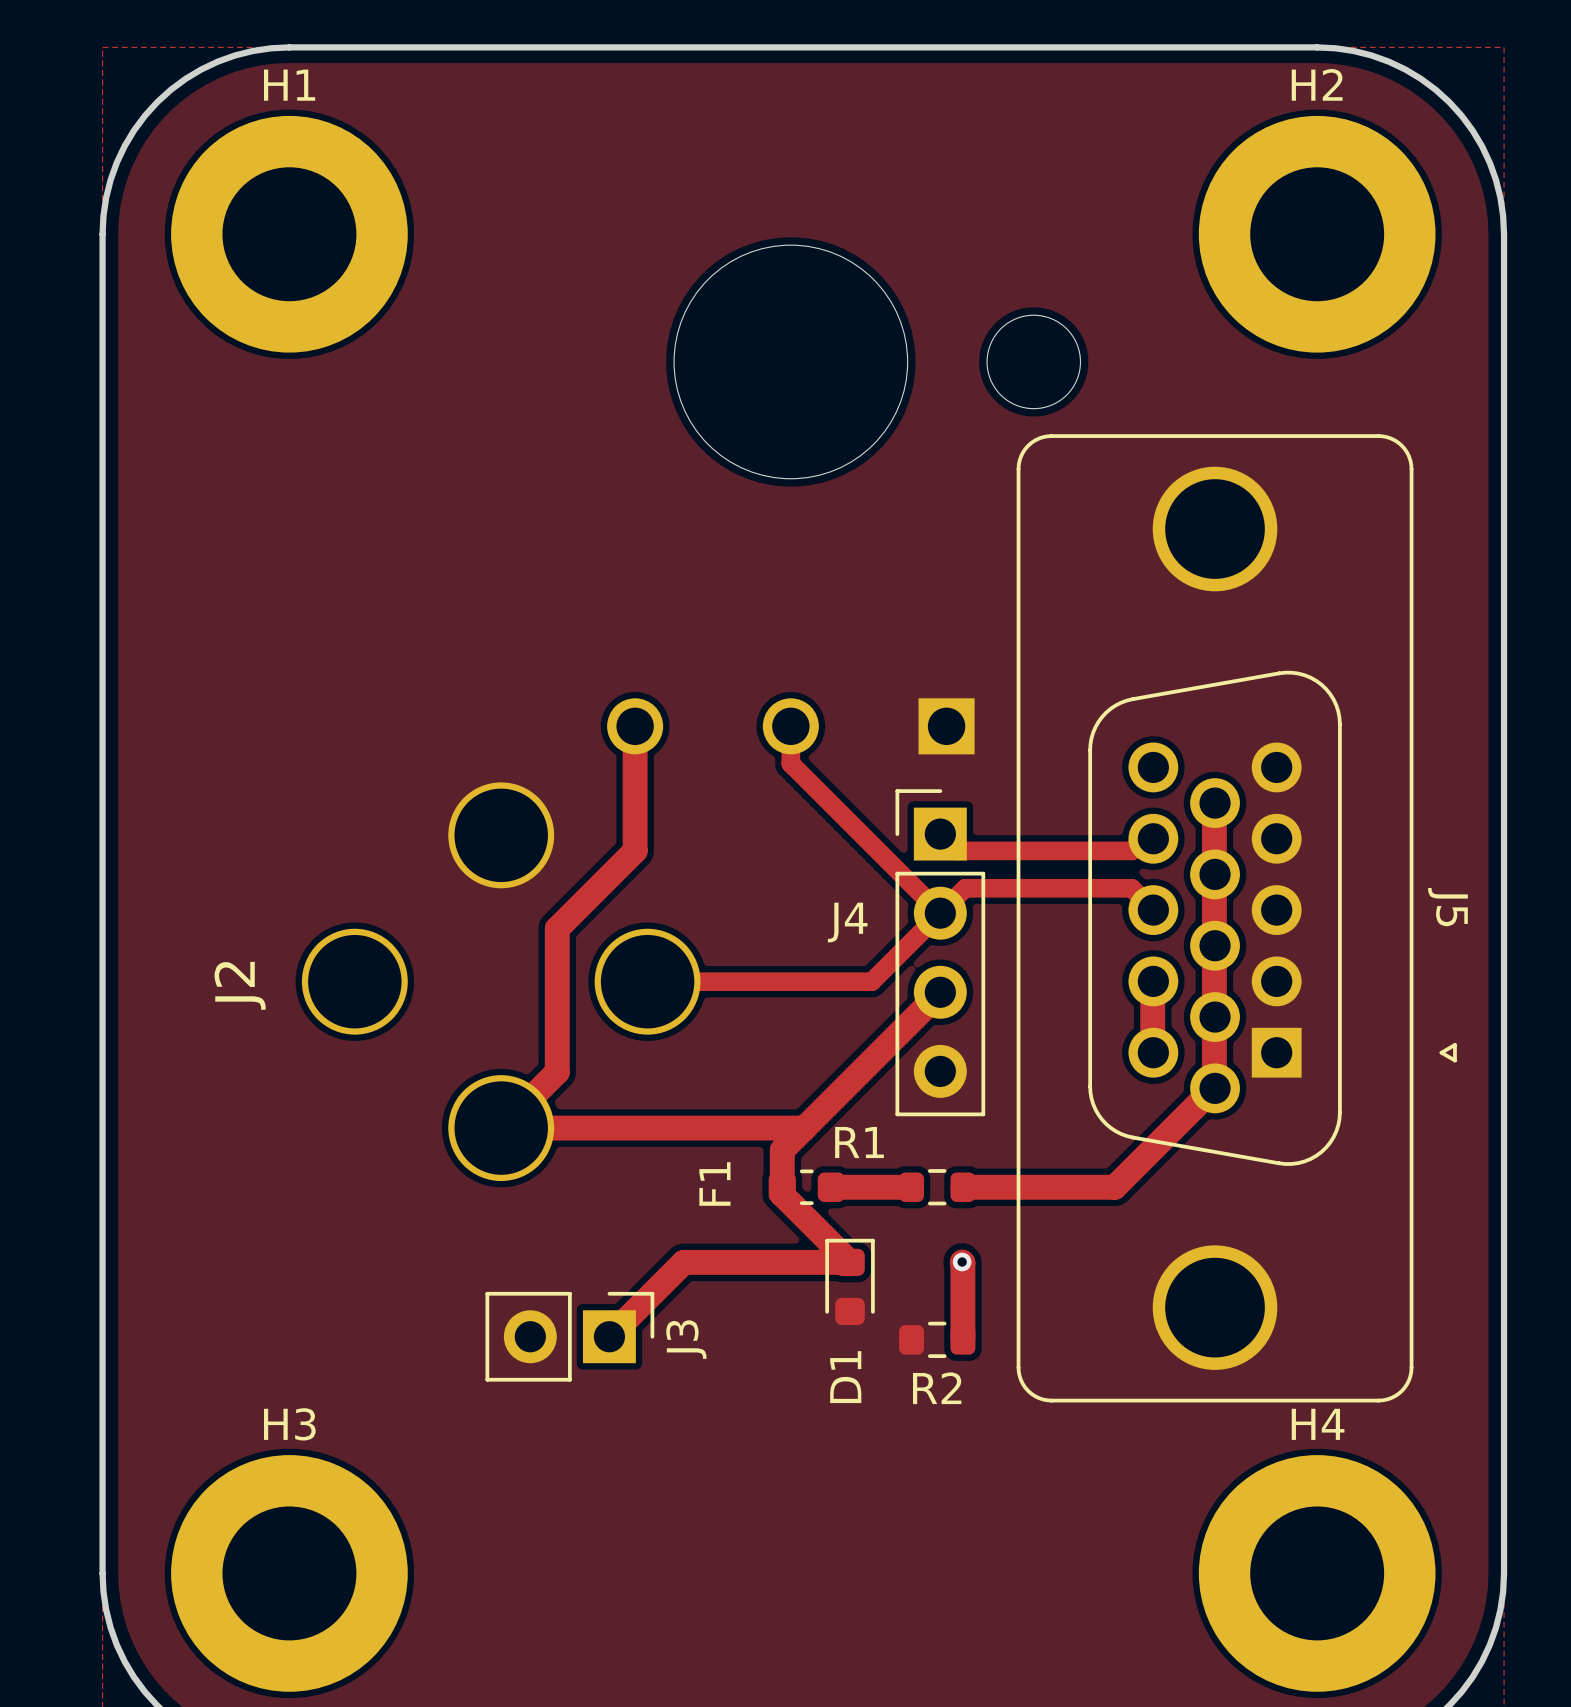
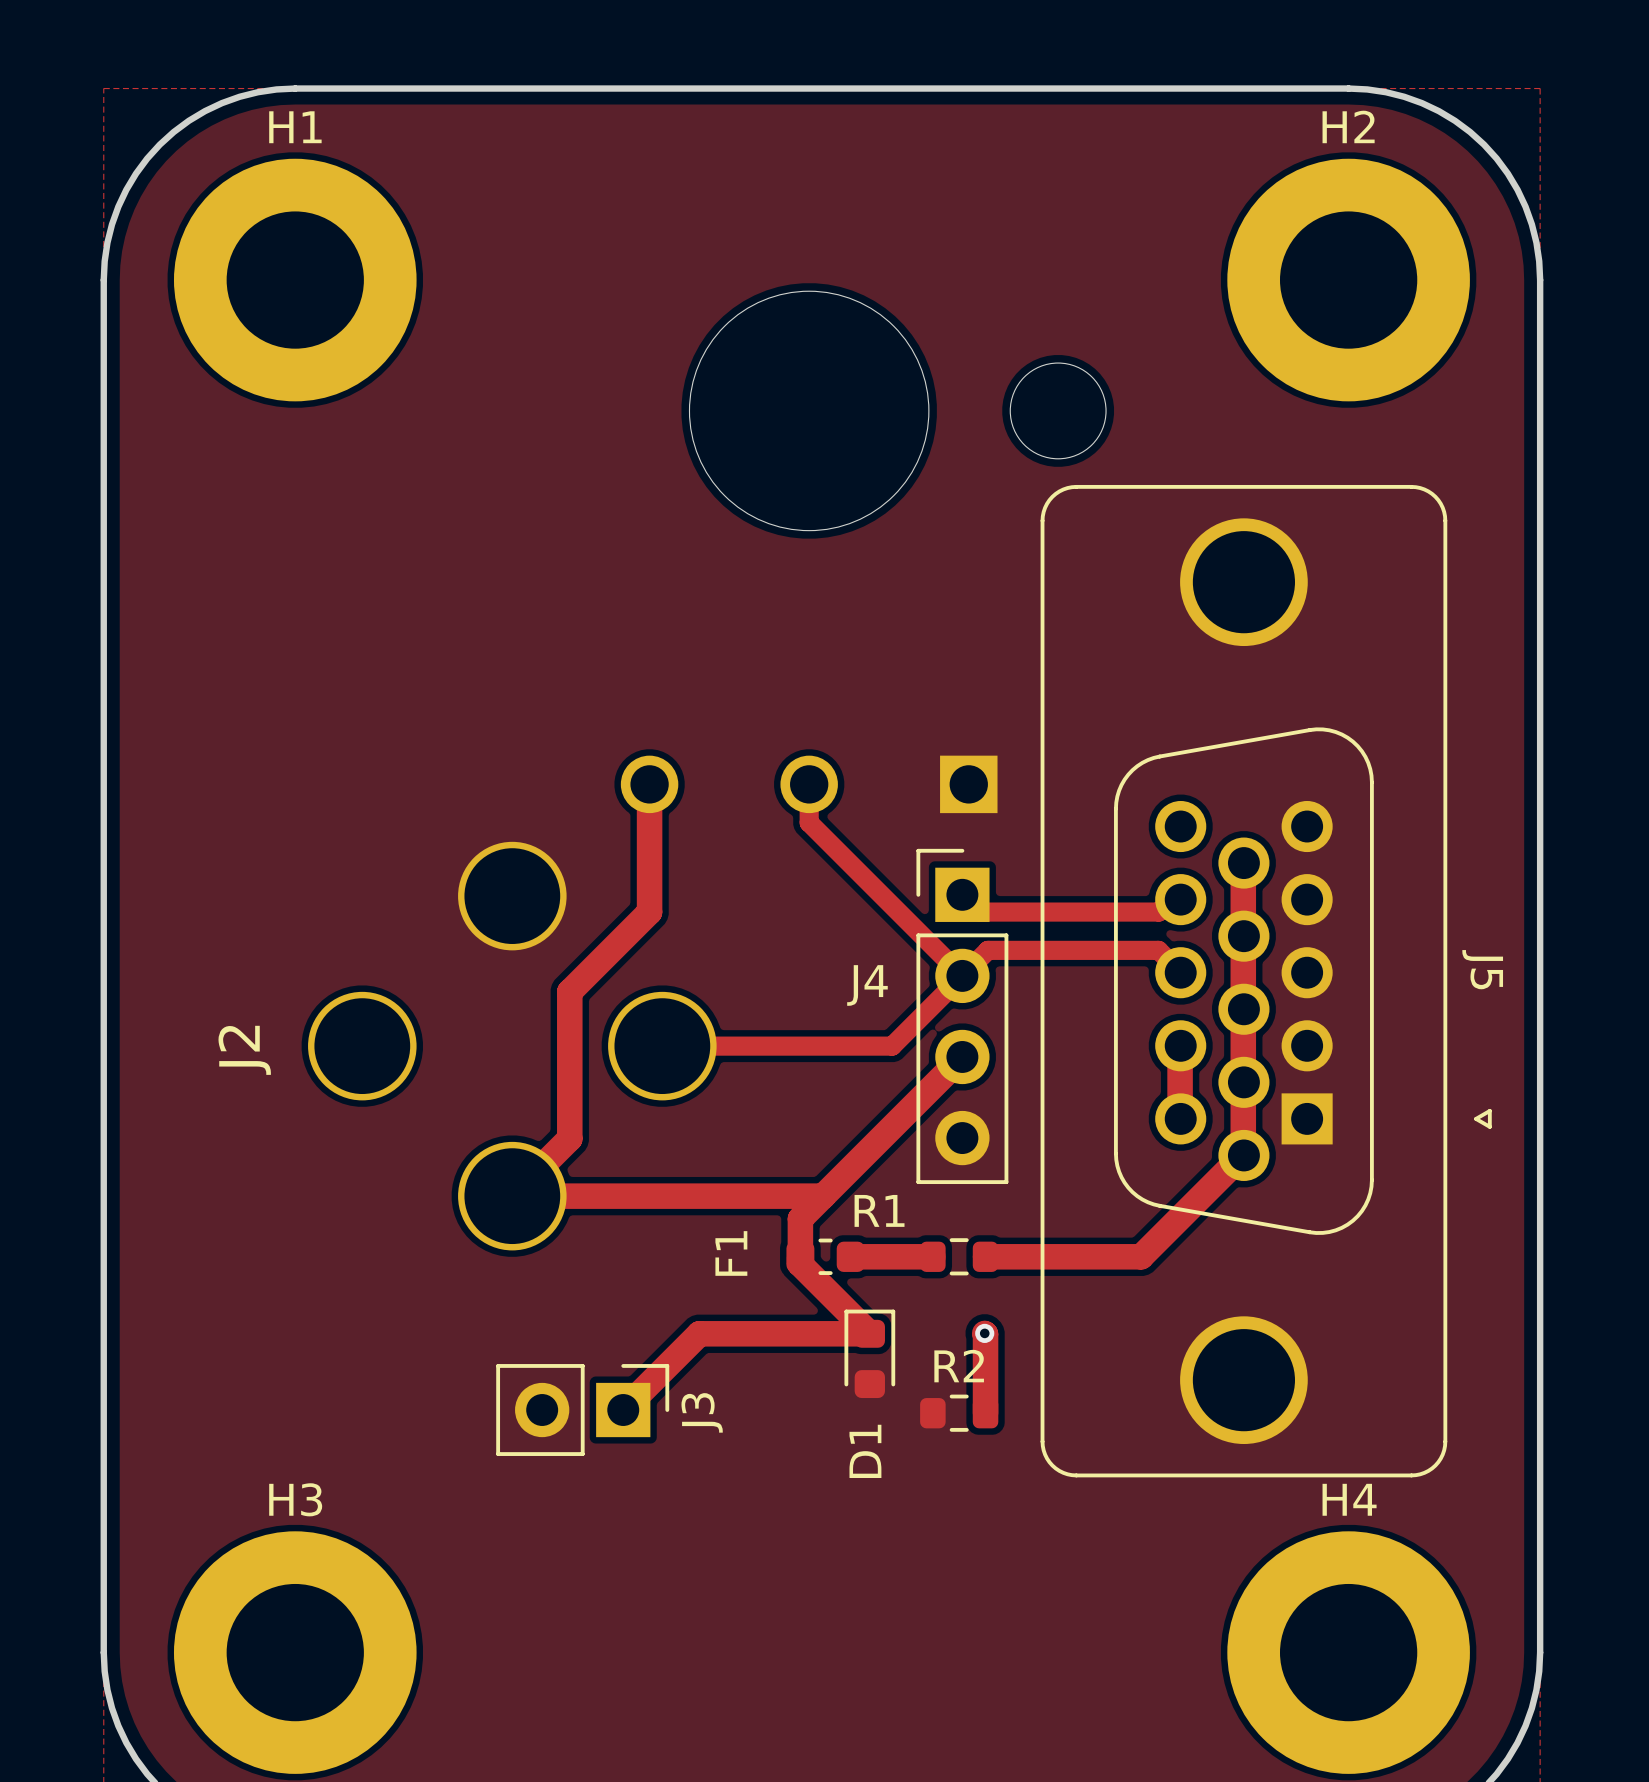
R2 name position: R2 (937, 1388) -> R2 (959, 1366)

